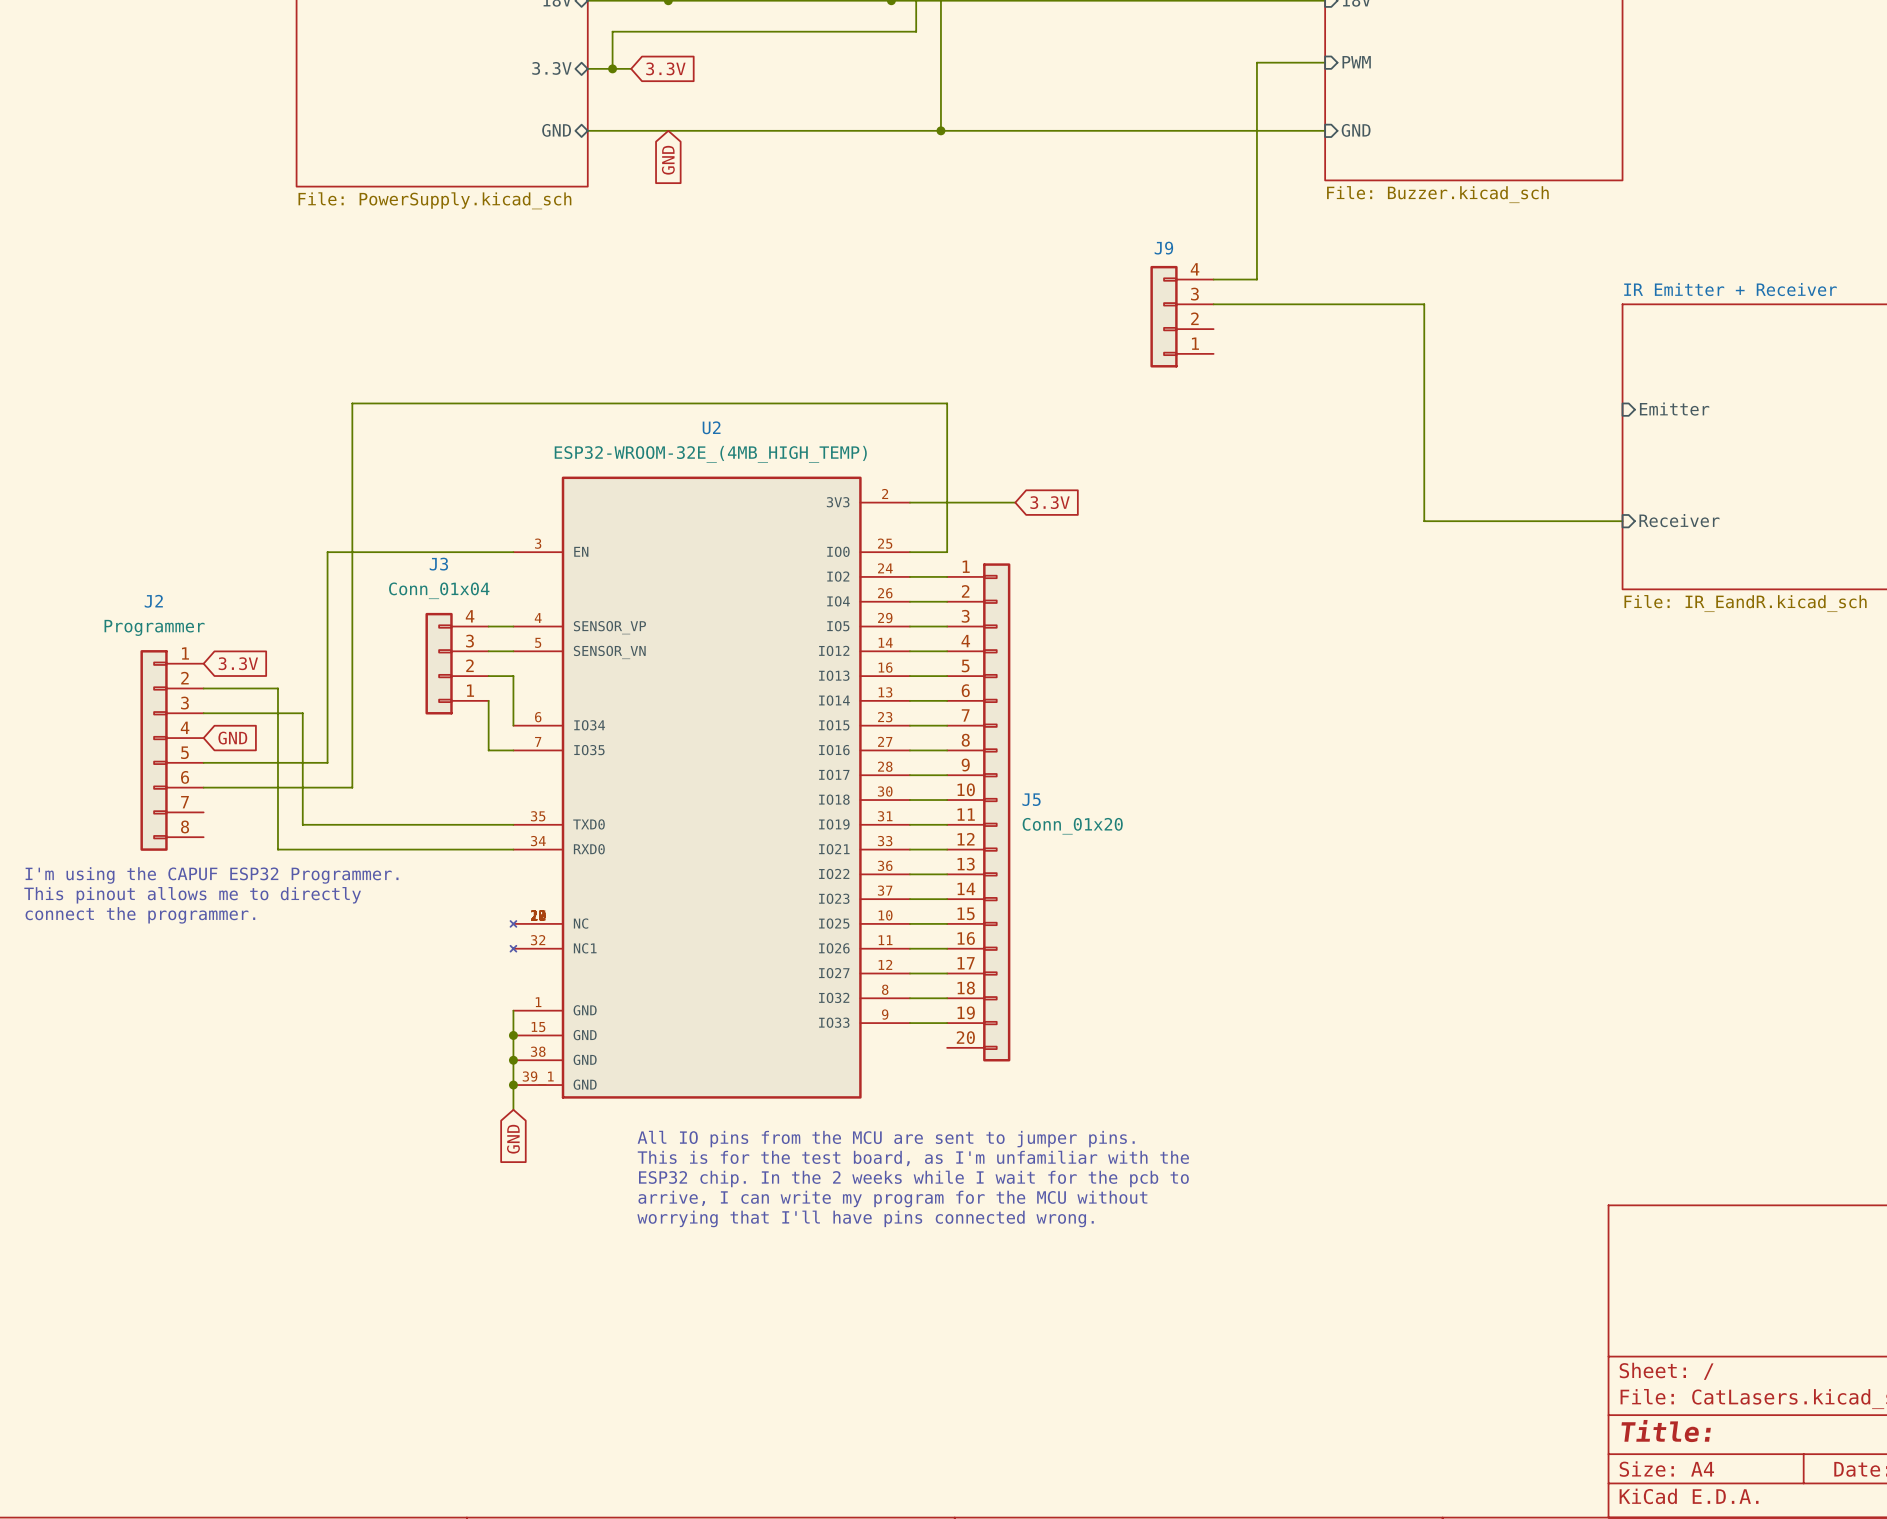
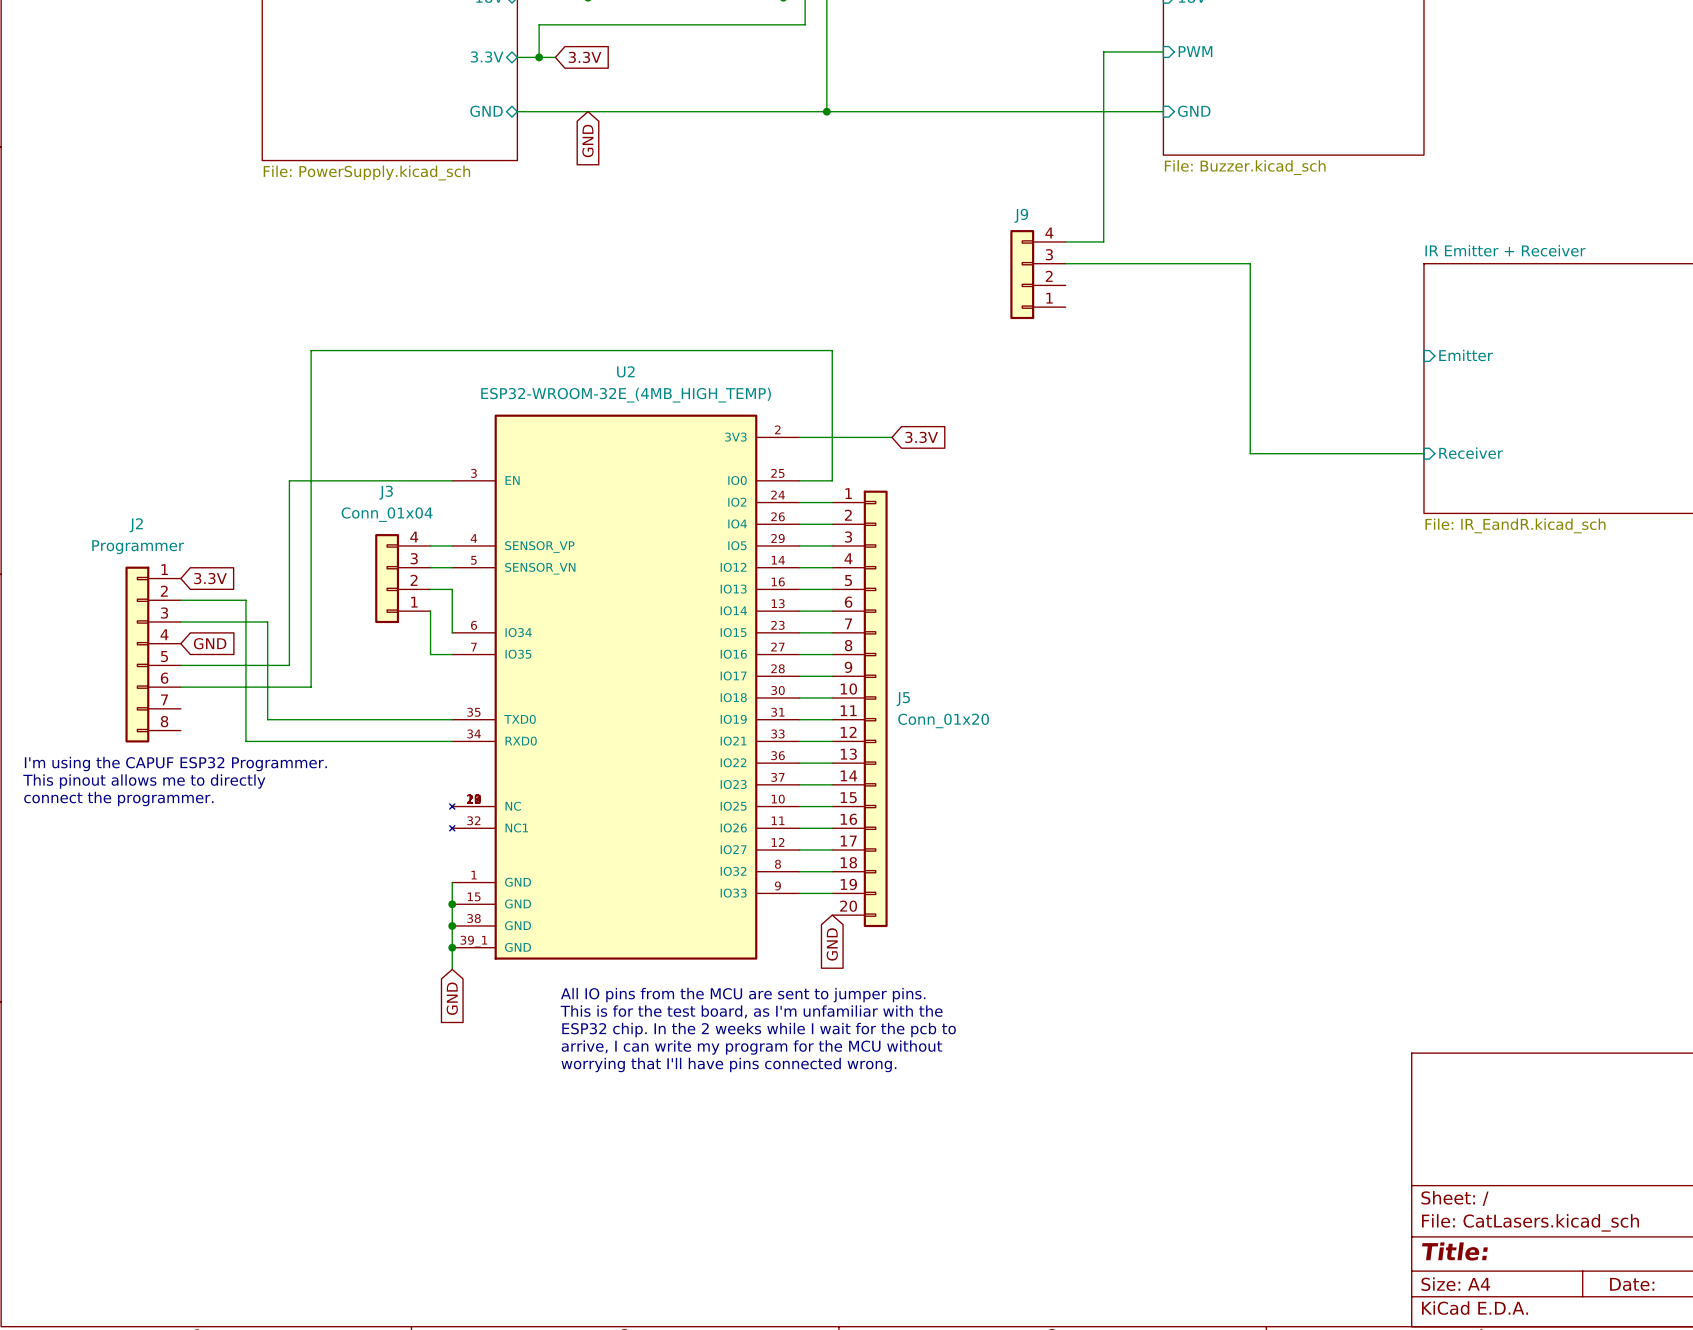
global label: none -> GND (832, 944)

